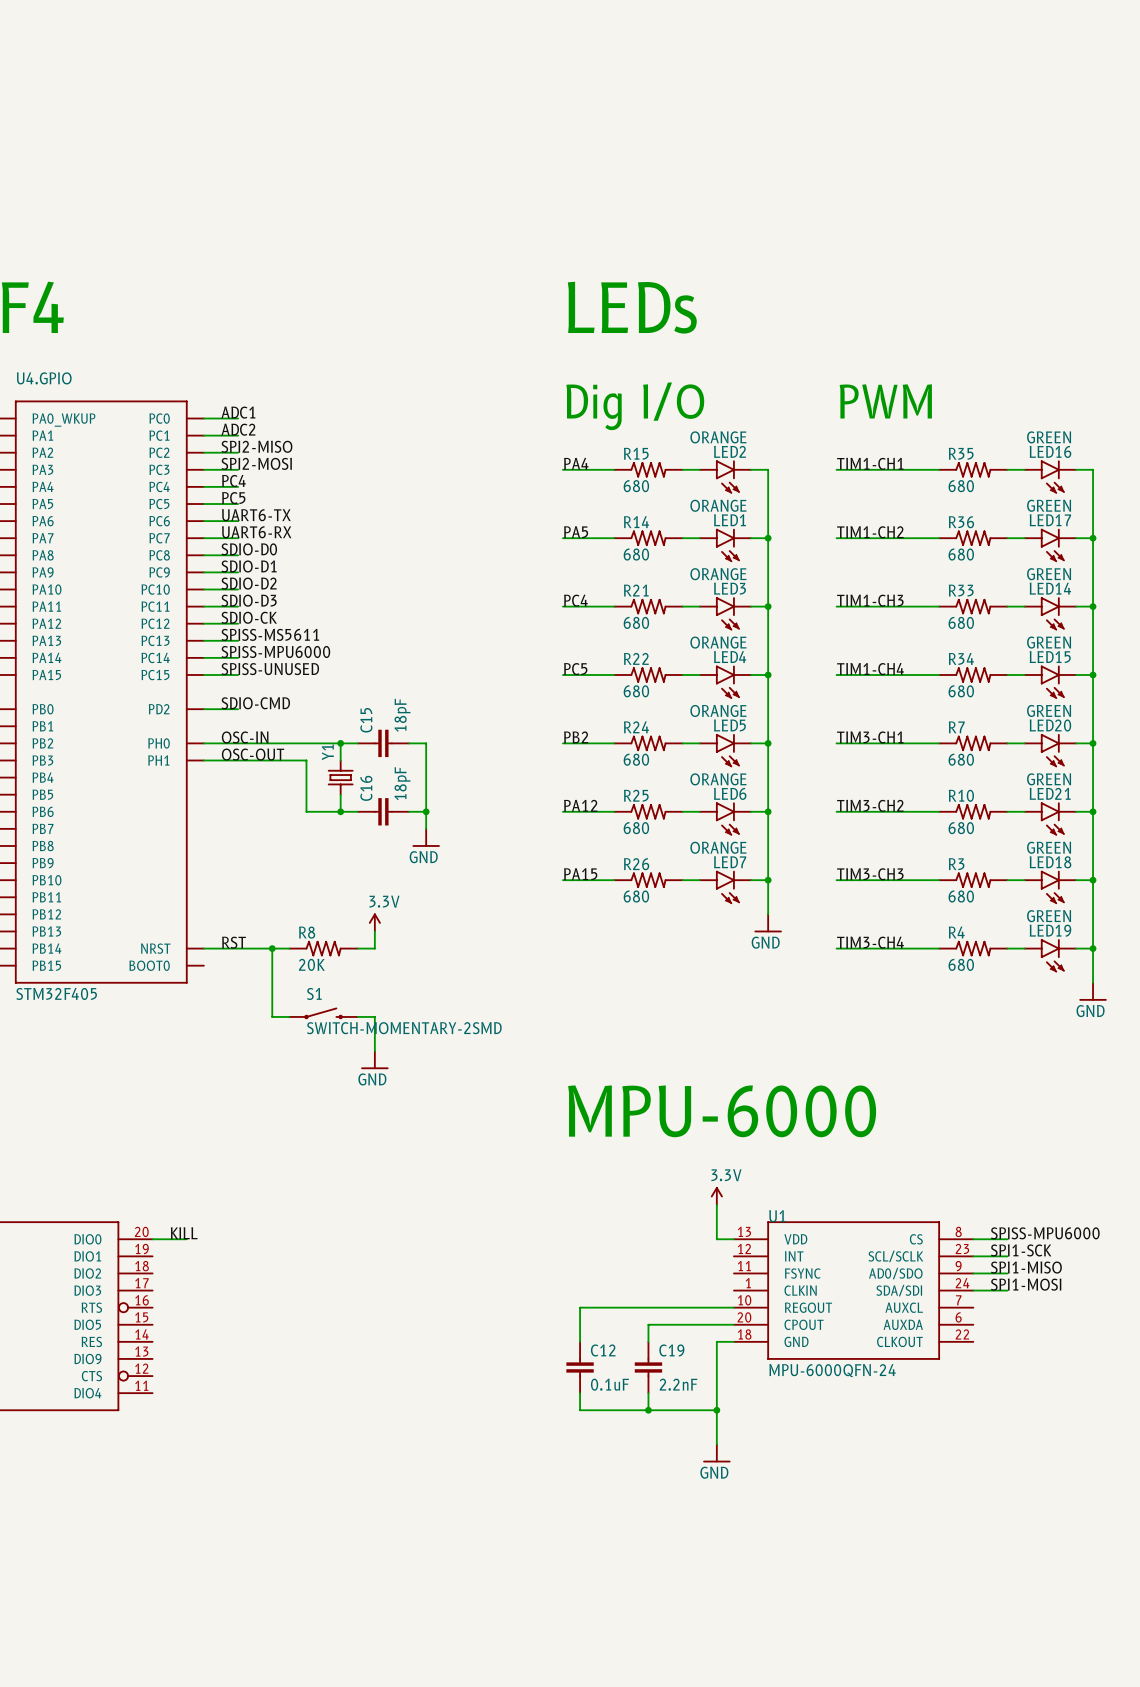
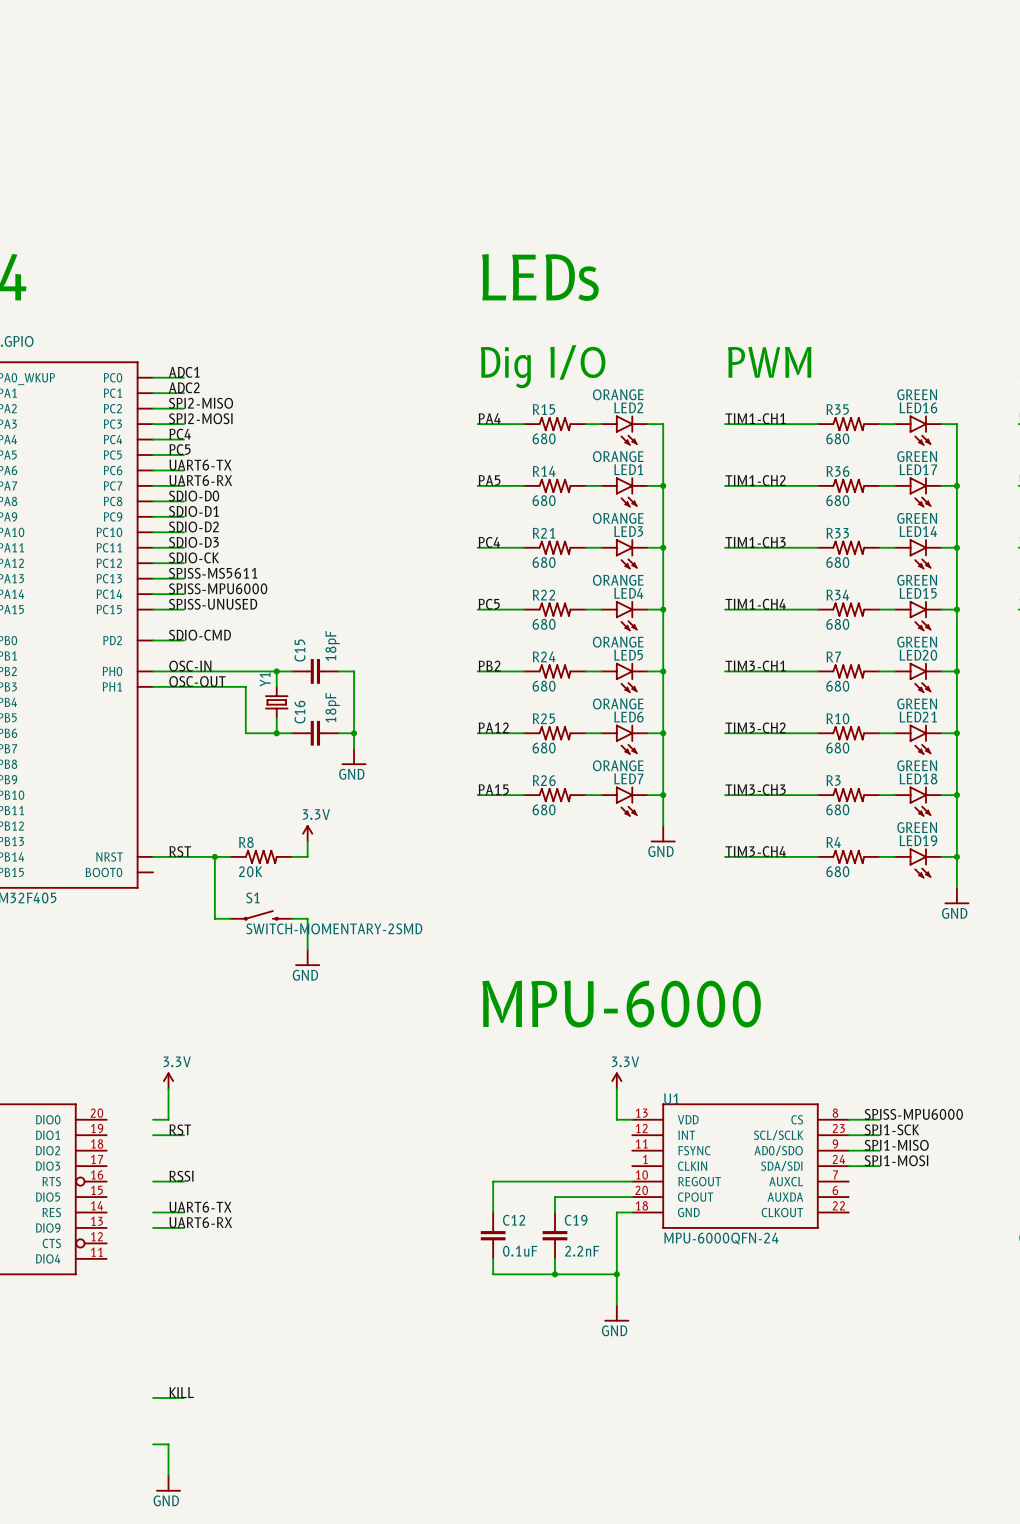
power symbol: none -> 3.3V (168, 1080)
wire: none -> (168, 1088) (168, 1119) (153, 1119)
label: KILL (184, 1233) -> none
wire: (152, 1239) (186, 1239) -> (153, 1135) (183, 1135)
label: none -> RST (180, 1129)
label: none -> RSSI (181, 1176)
wire: none -> (153, 1181) (183, 1181)
label: none -> UART6-TX (200, 1207)
wire: none -> (153, 1212) (183, 1212)
label: none -> UART6-RX (200, 1222)
wire: none -> (153, 1227) (183, 1227)
label: none -> KILL (181, 1392)
wire: none -> (153, 1398) (183, 1398)
wire: none -> (153, 1444) (168, 1444) (168, 1475)
power symbol: none -> GND (168, 1483)

